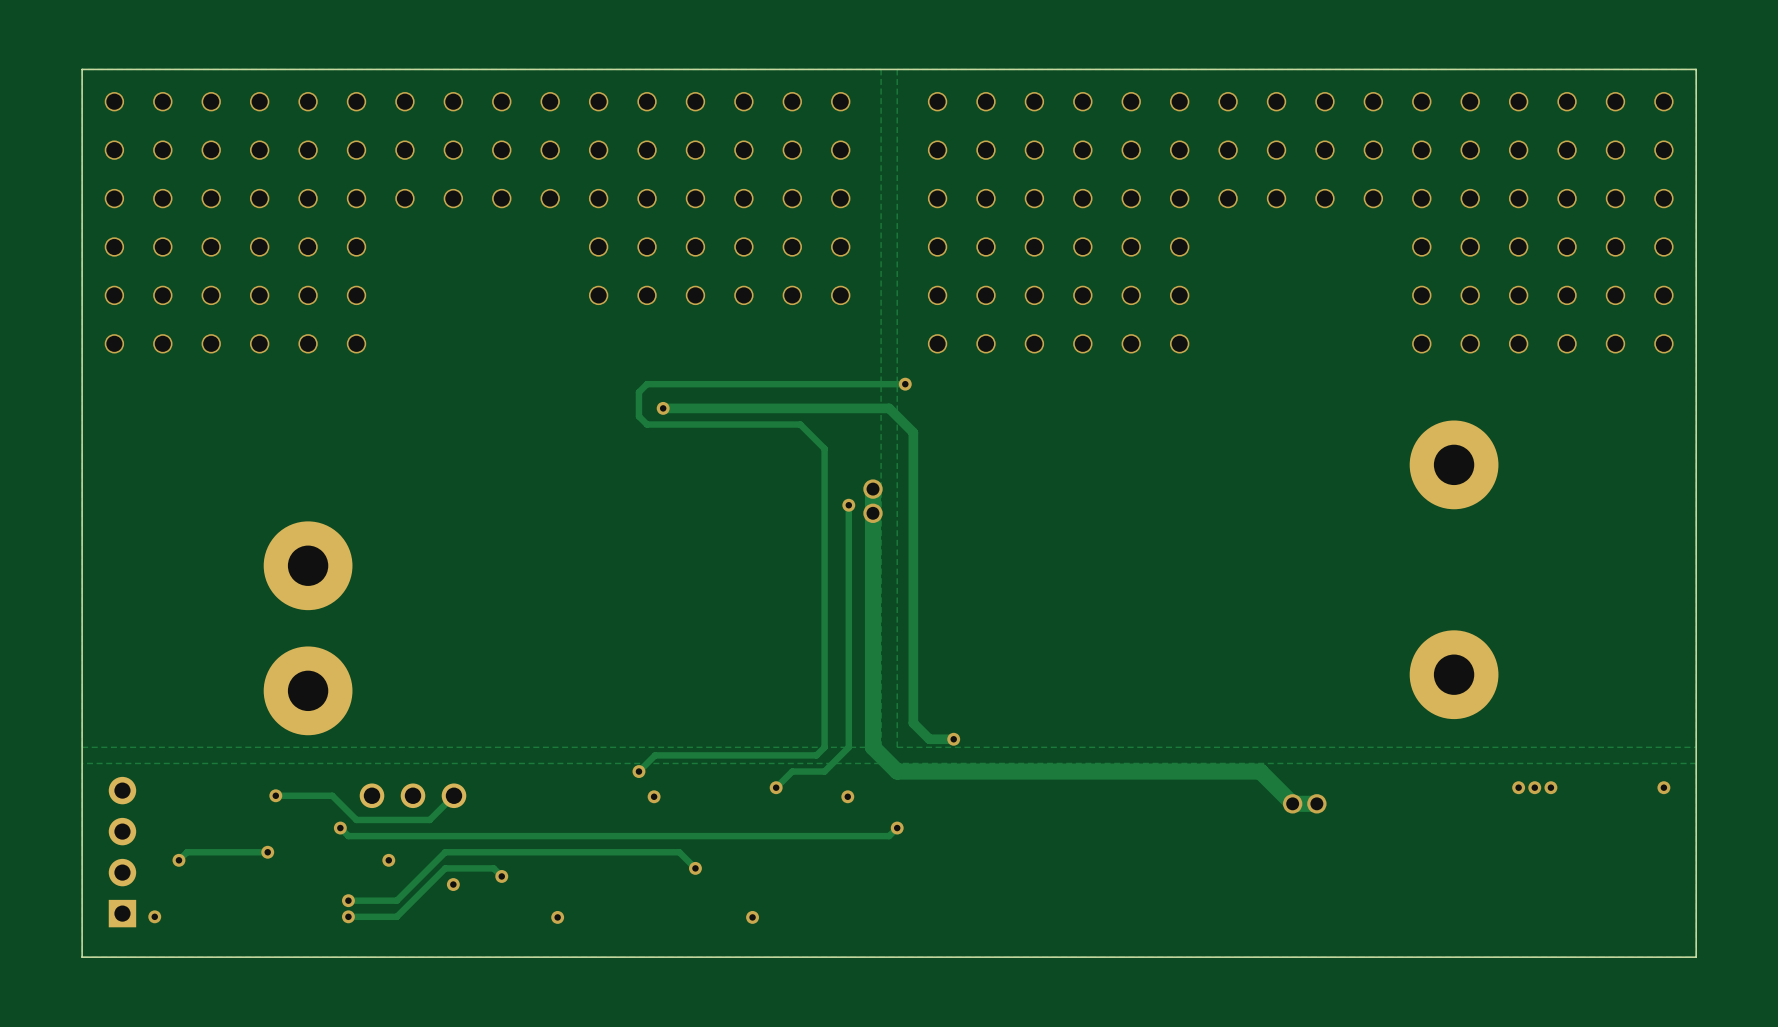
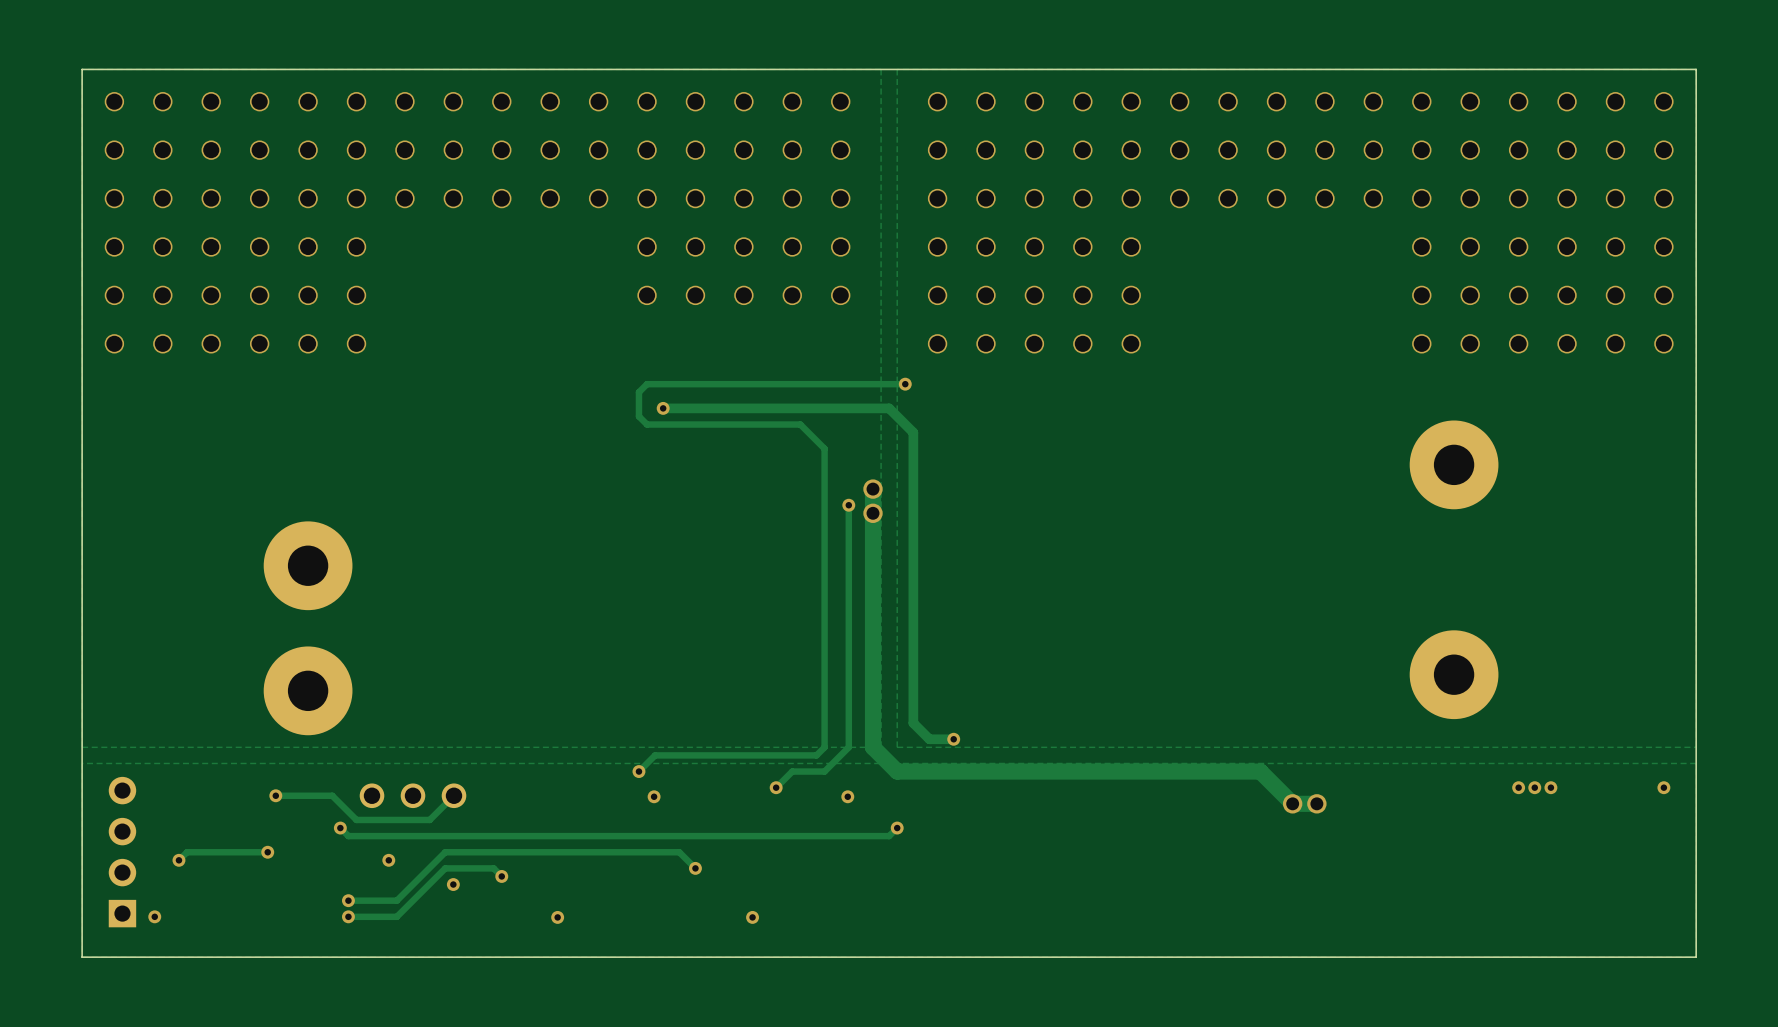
via: (598, 246) -> none
via: (1179, 246) -> none
via: (598, 295) -> none
via: (1179, 295) -> none
via: (1179, 343) -> none

